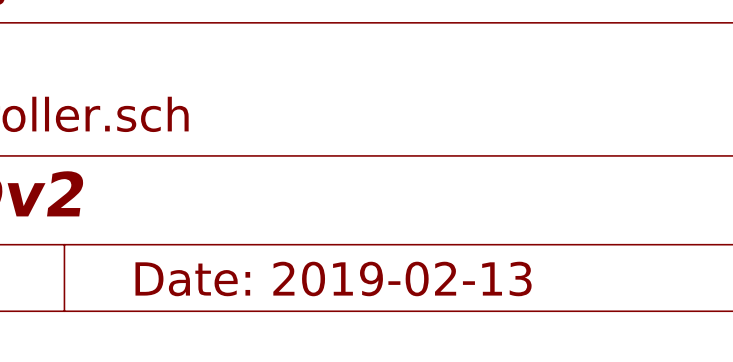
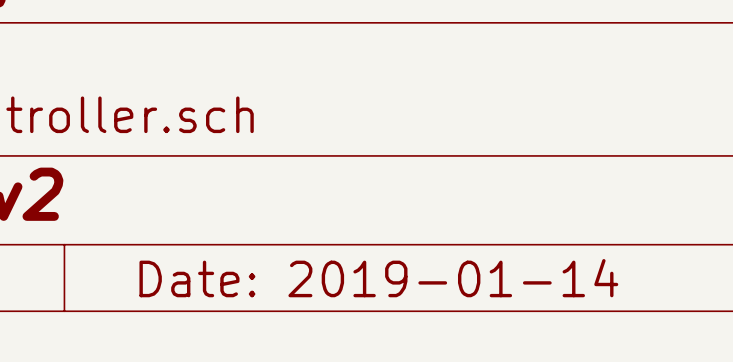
title block: Date: 2019-02-13 (333, 278) -> Date: 2019-01-14 (378, 278)

